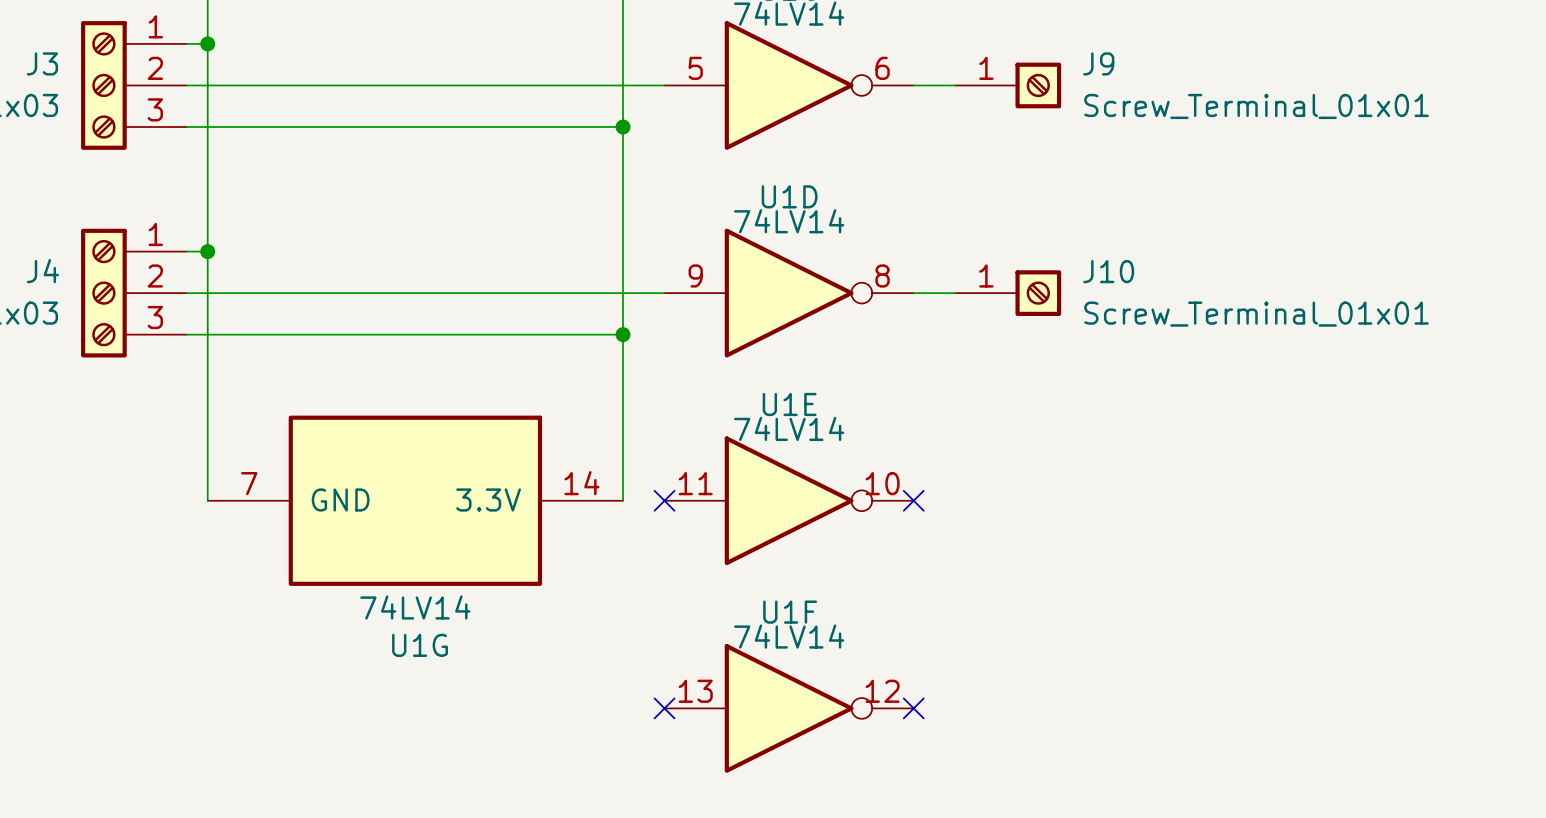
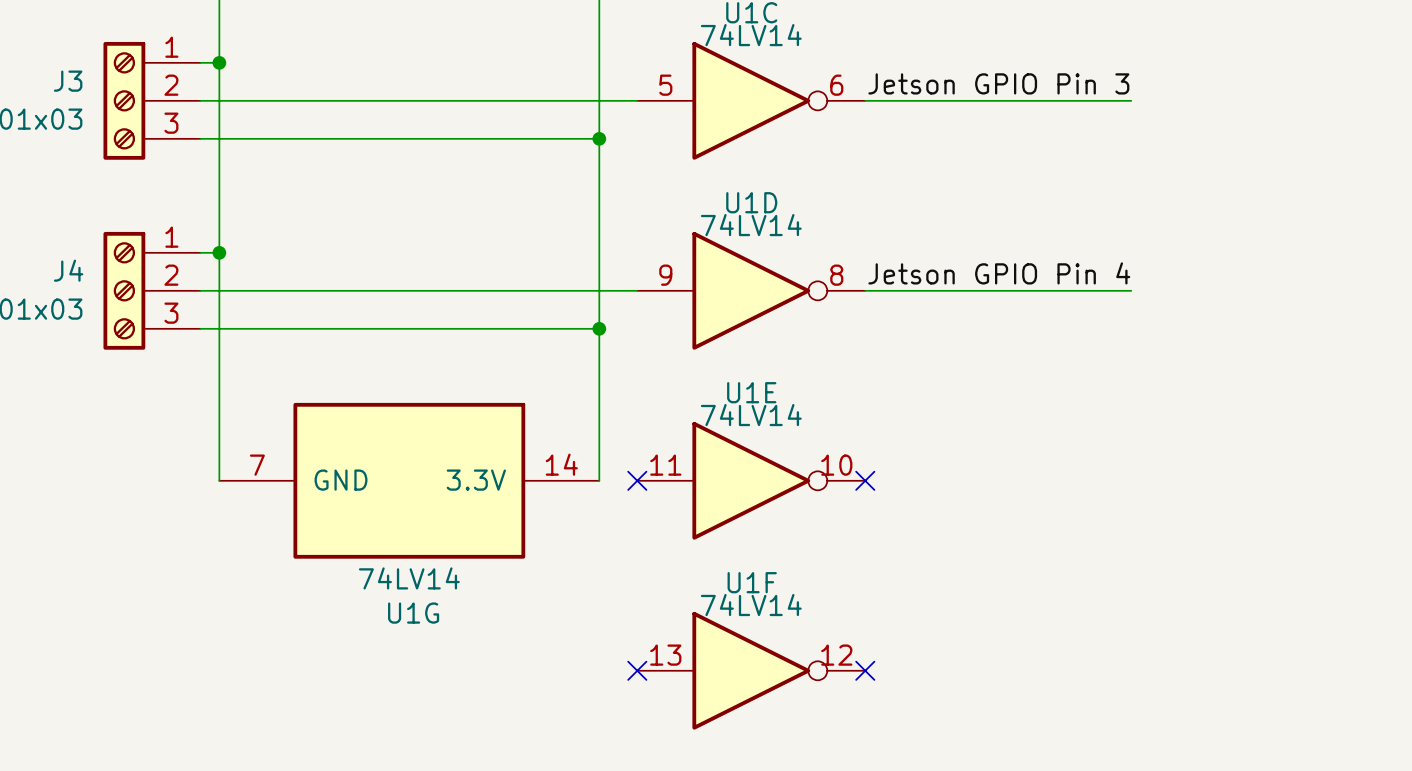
label: none -> Jetson GPIO Pin 3 (998, 83)
wire: none -> (903, 100) (1131, 100)
J9: Screw_Terminal_01x01 (1008, 85) -> none
label: none -> Jetson GPIO Pin 4 (999, 273)
wire: none -> (903, 290) (1131, 290)
J10: Screw_Terminal_01x01 (1008, 293) -> none

